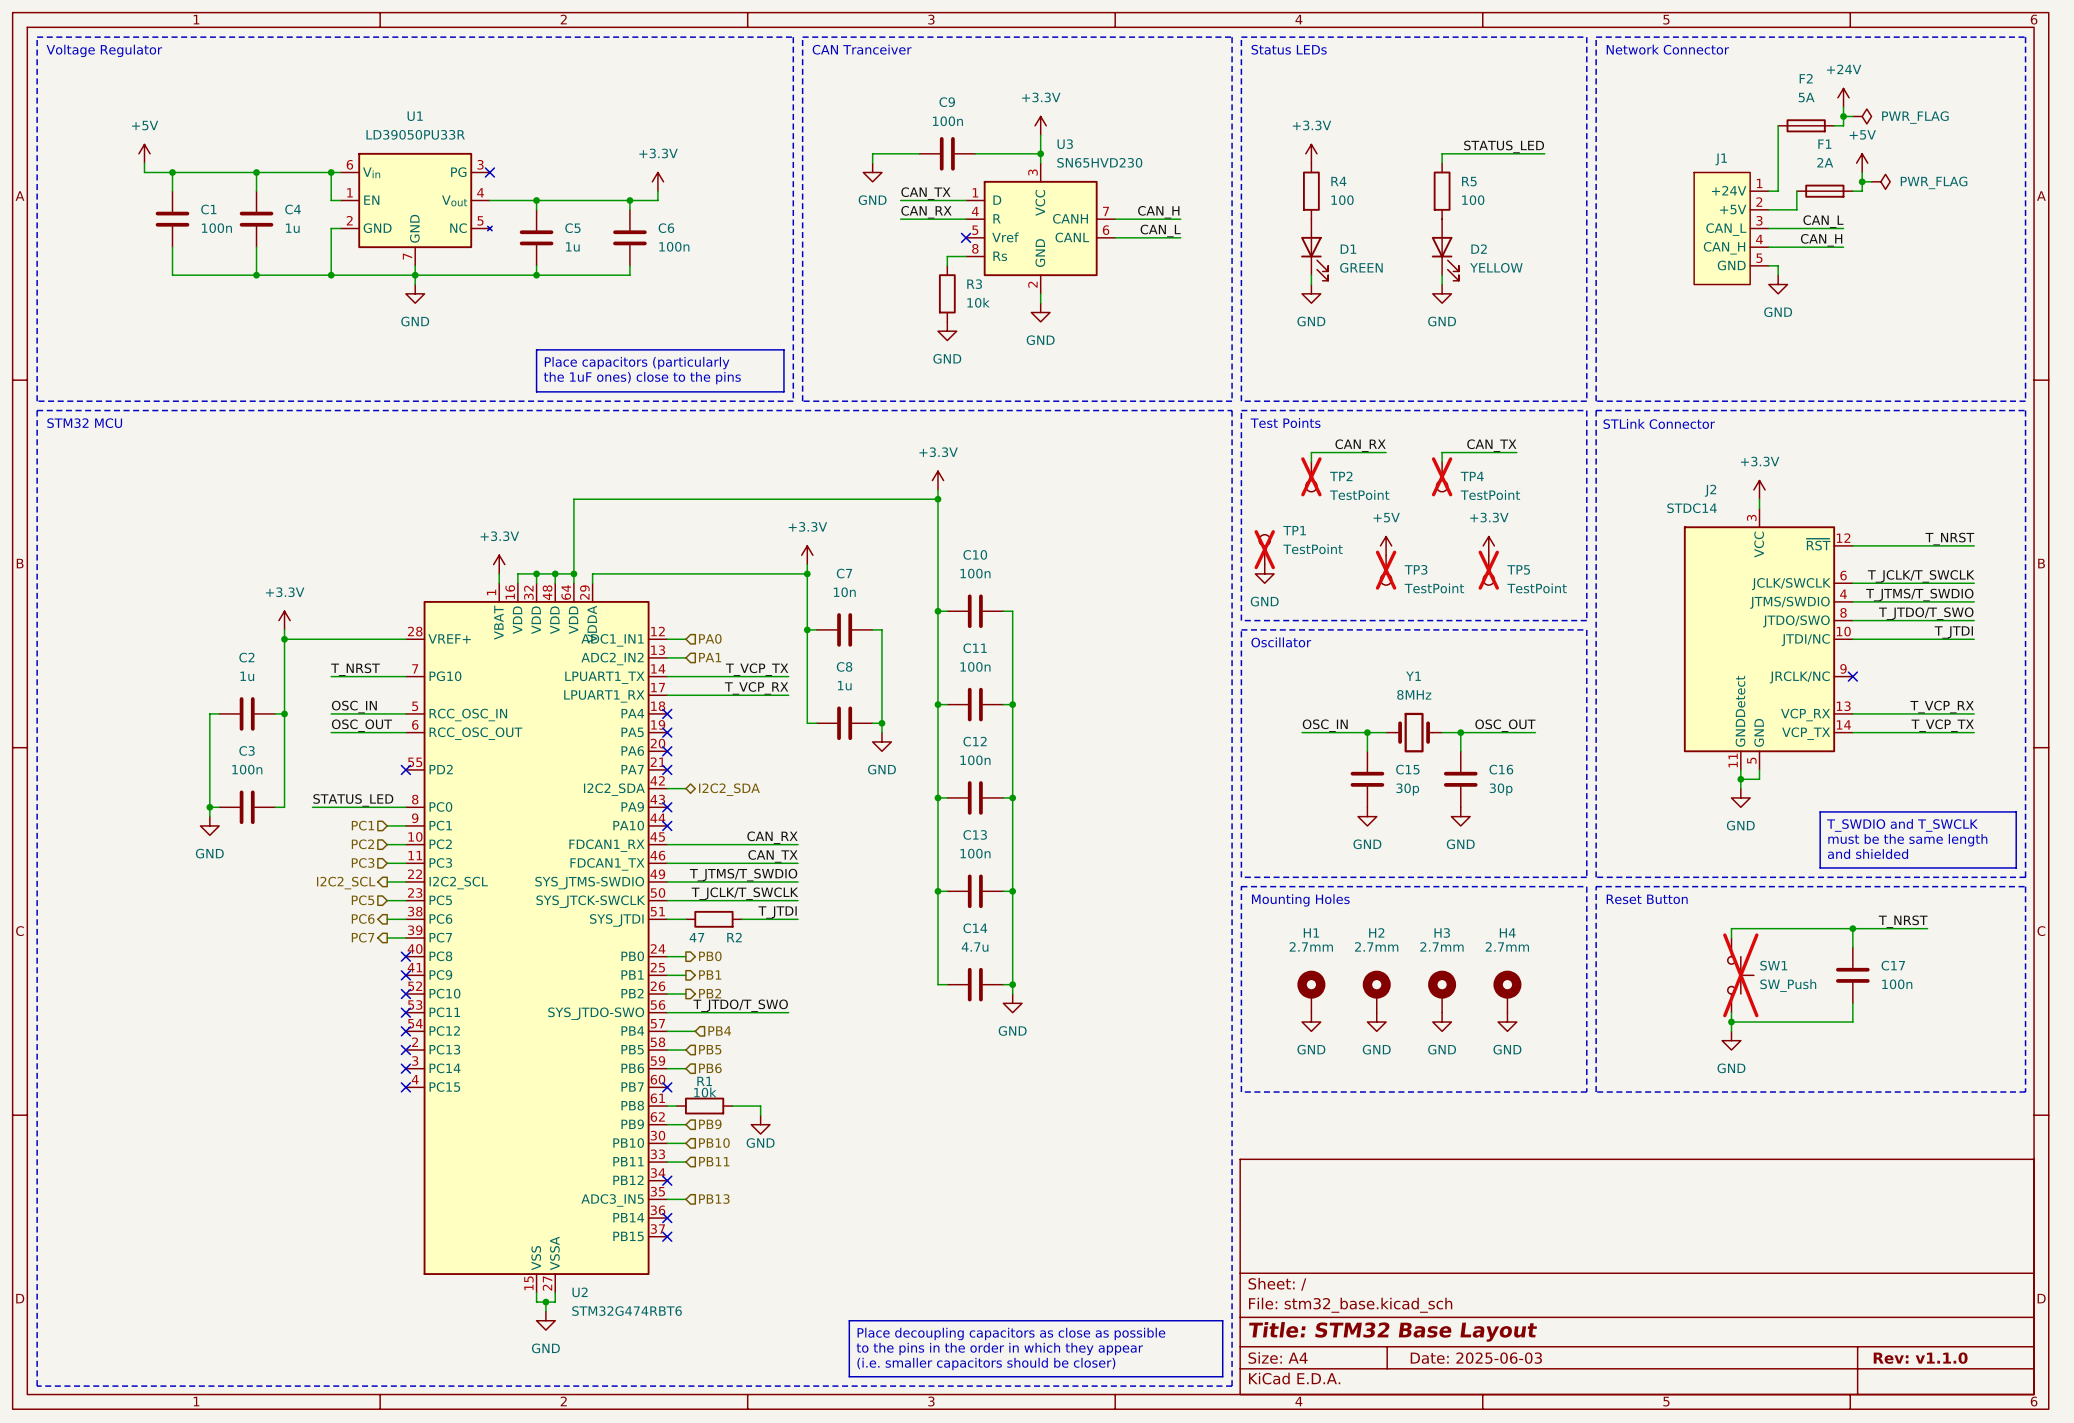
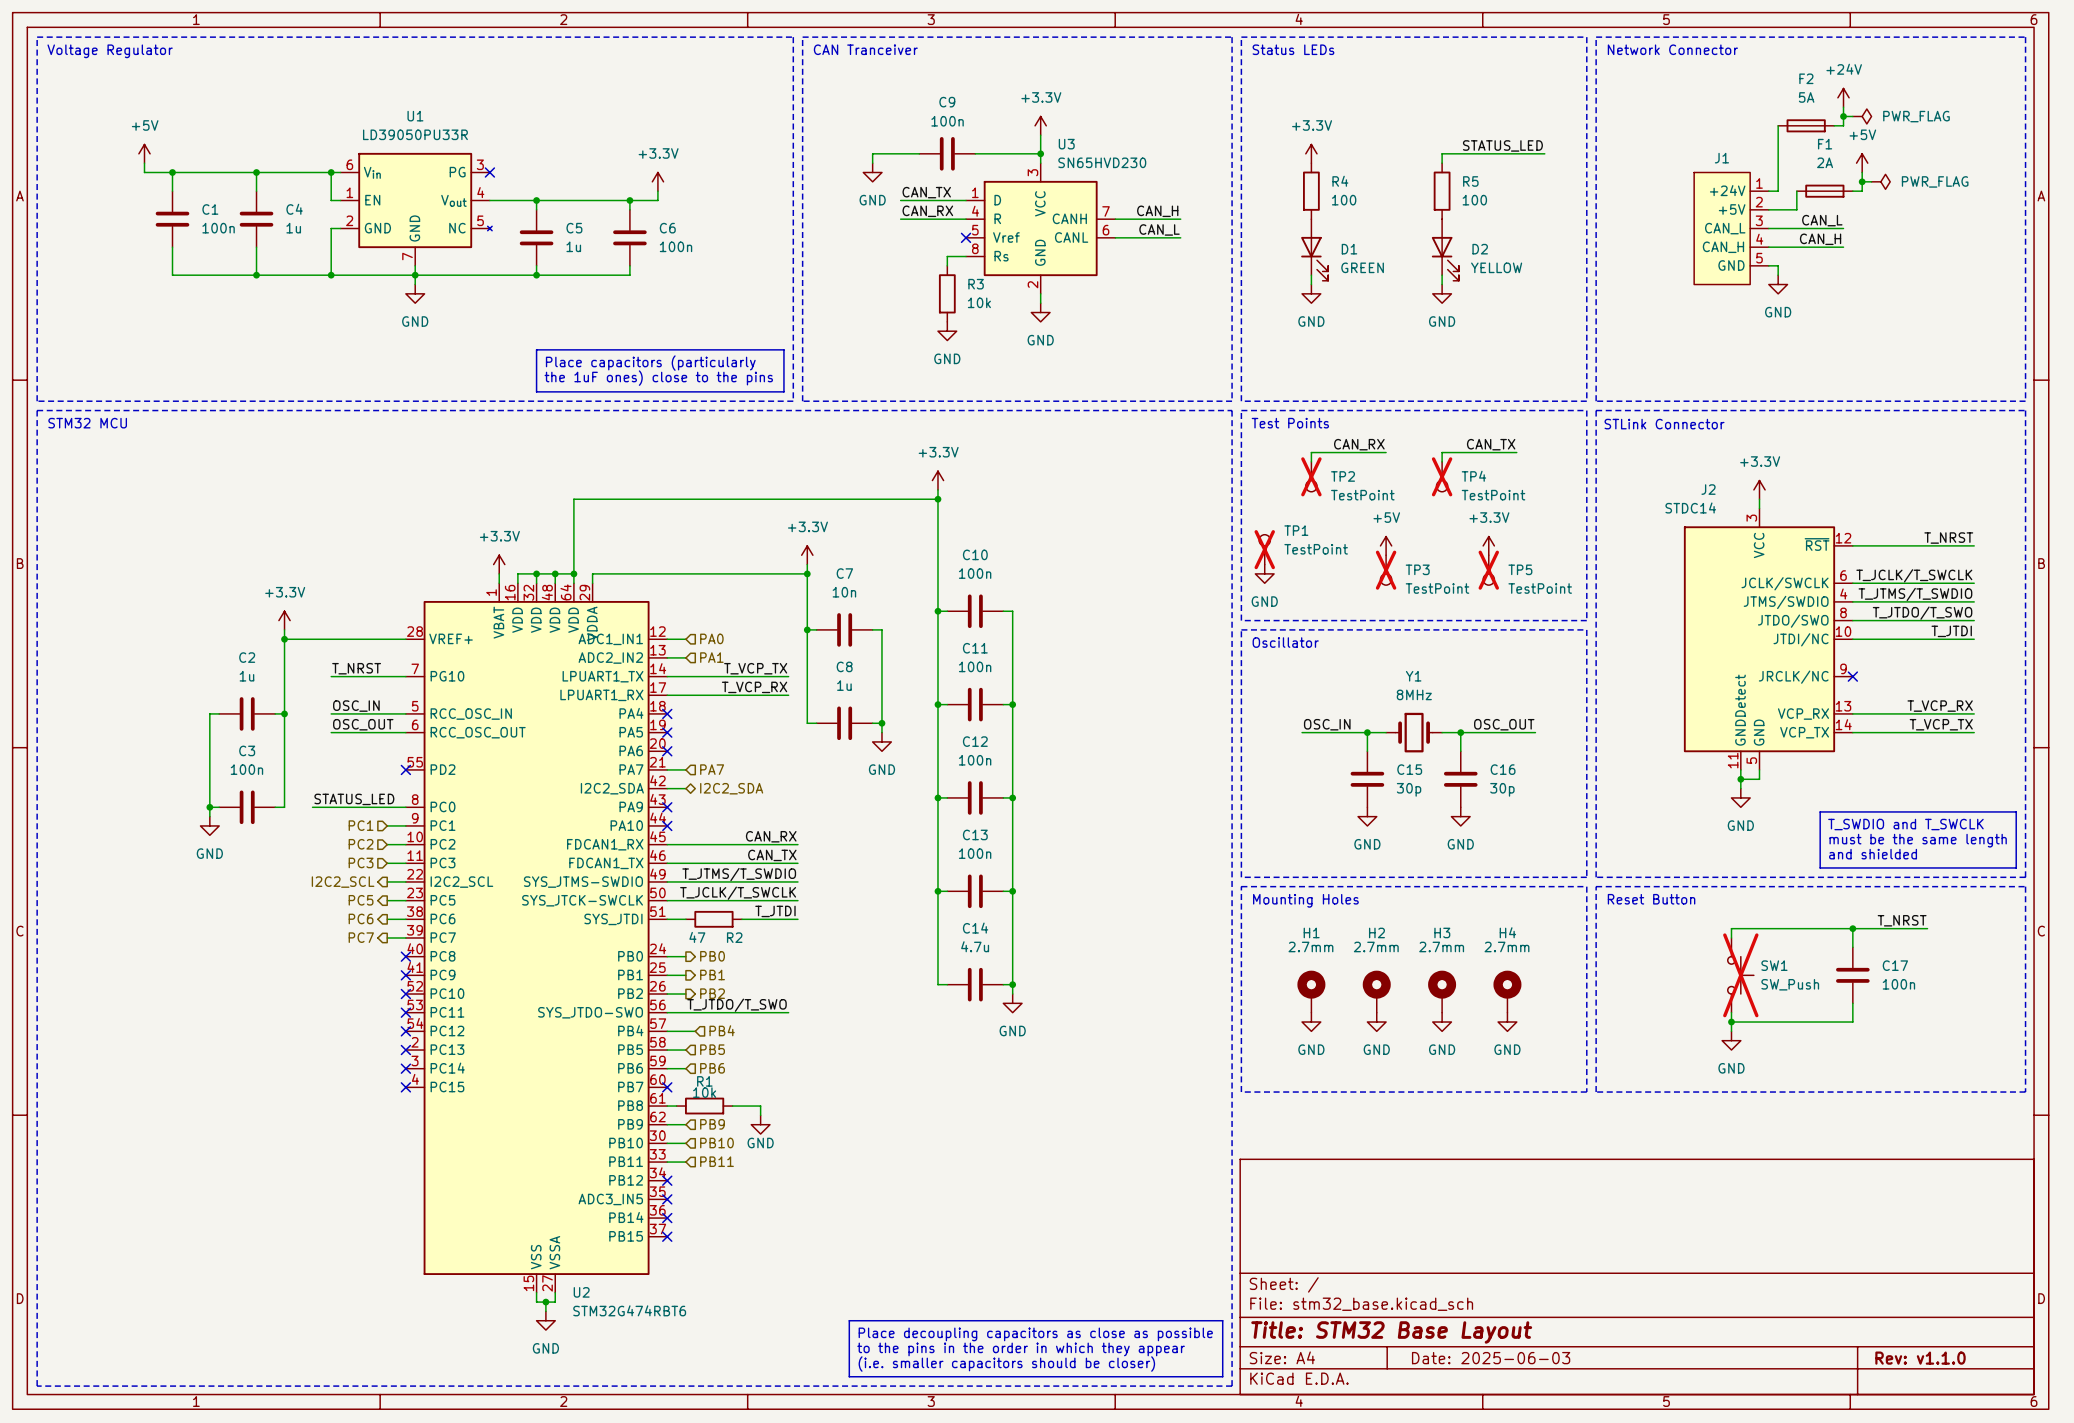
wire: none -> (667, 769) (685, 769)
no-connect mark: (667, 769) -> none
hierarchical label: none -> PA7 (712, 769)
hierarchical label shape: input (363, 900) -> output (361, 900)
wire: (667, 1199) (685, 1199) -> none
no-connect mark: none -> (667, 1199)
hierarchical label: PB13 (714, 1199) -> none

